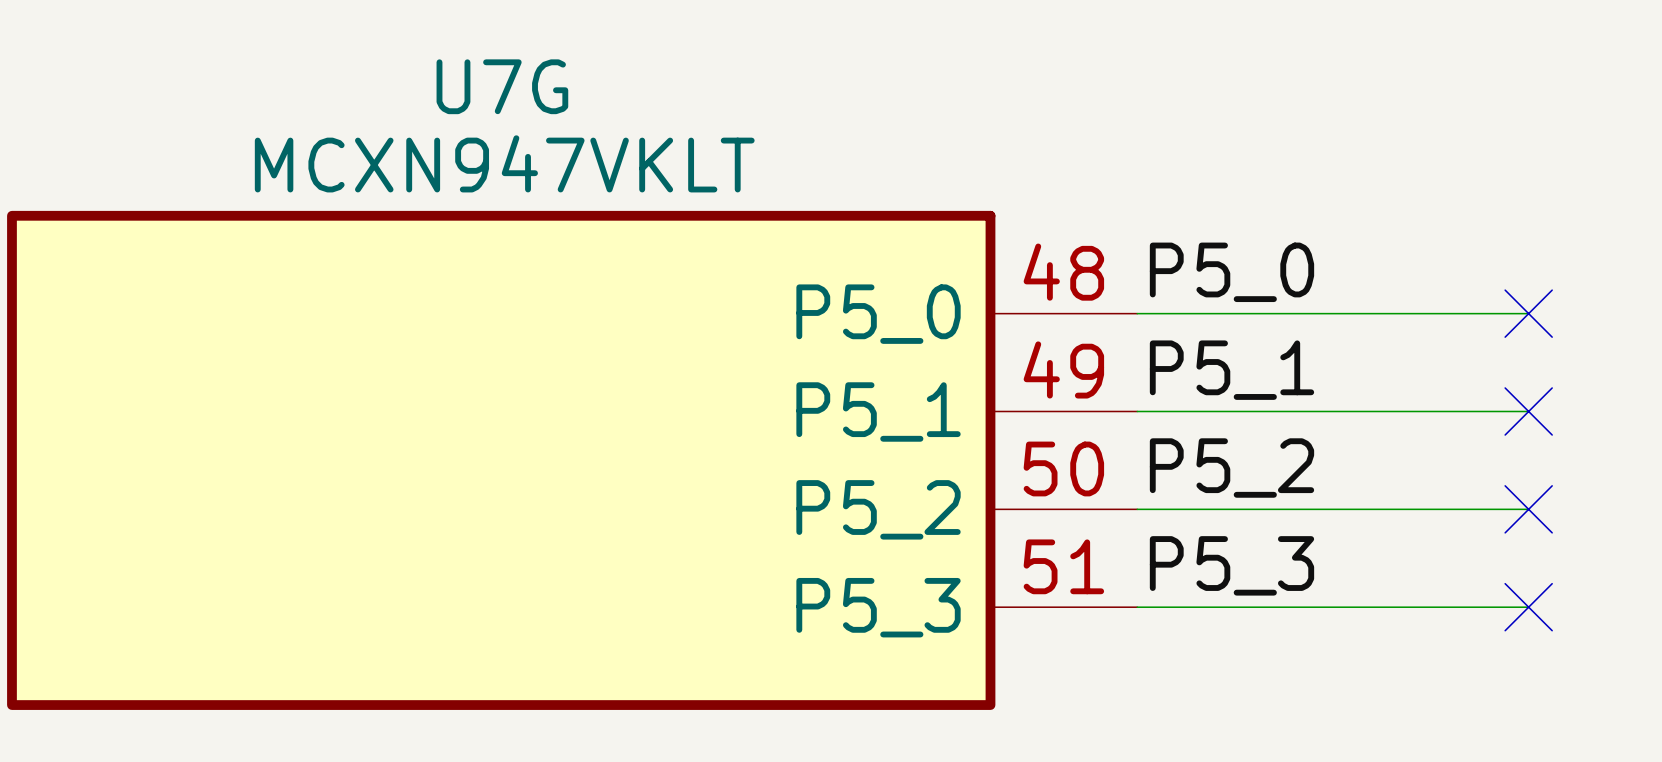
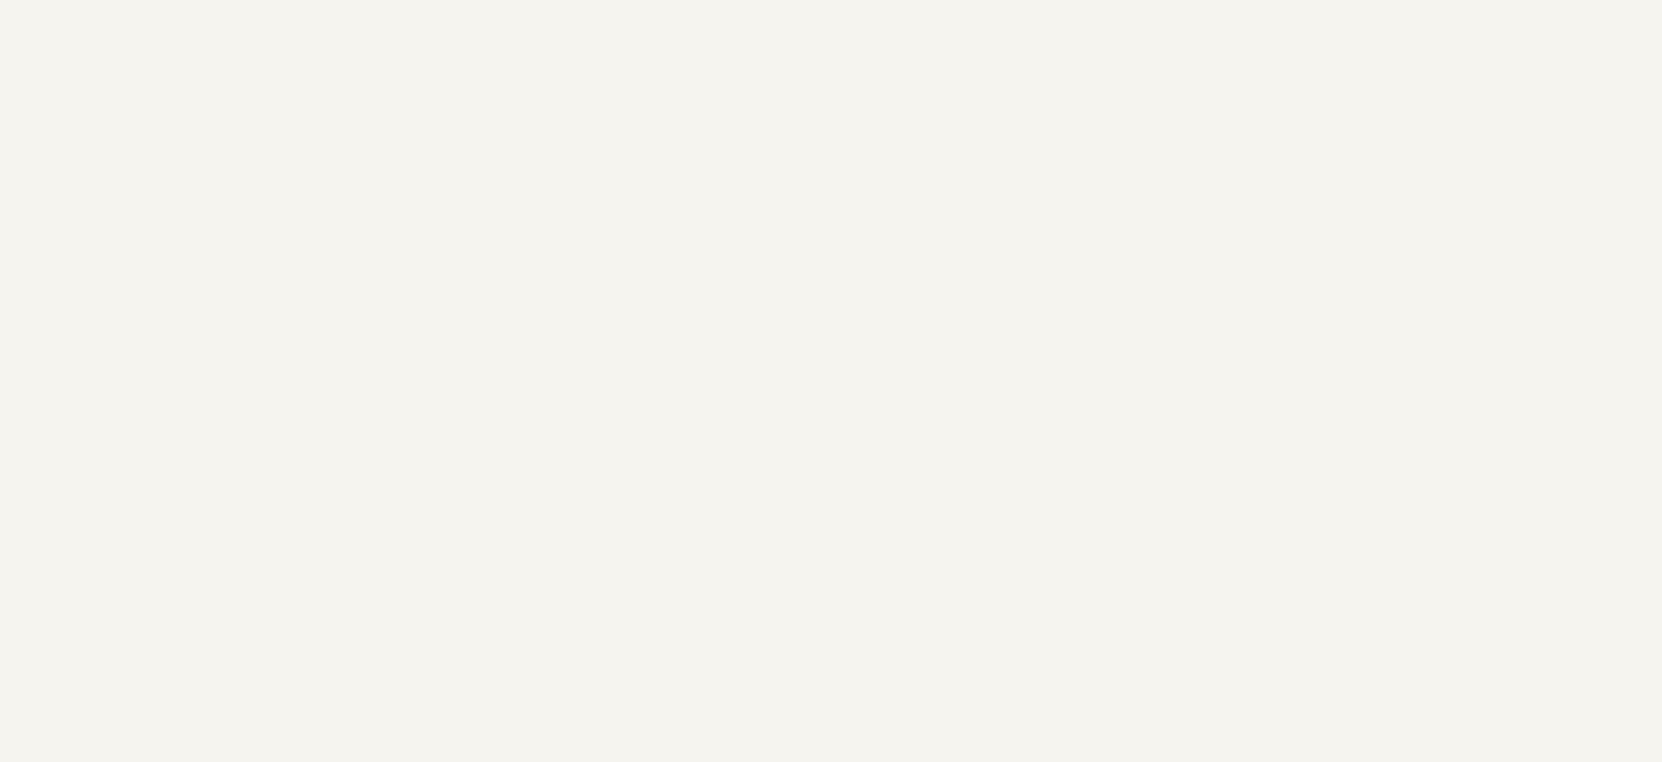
label: P5_0 (1231, 272) -> none
wire: (1137, 313) (1528, 313) -> none
no-connect mark: (1528, 313) -> none
label: P5_1 (1231, 370) -> none
wire: (1137, 411) (1528, 411) -> none
no-connect mark: (1528, 411) -> none
U7G: MCXN947VKLT (572, 460) -> none
label: P5_2 (1231, 468) -> none
wire: (1137, 509) (1528, 509) -> none
no-connect mark: (1528, 509) -> none
label: P5_3 (1231, 565) -> none
wire: (1137, 607) (1528, 607) -> none
no-connect mark: (1528, 607) -> none

